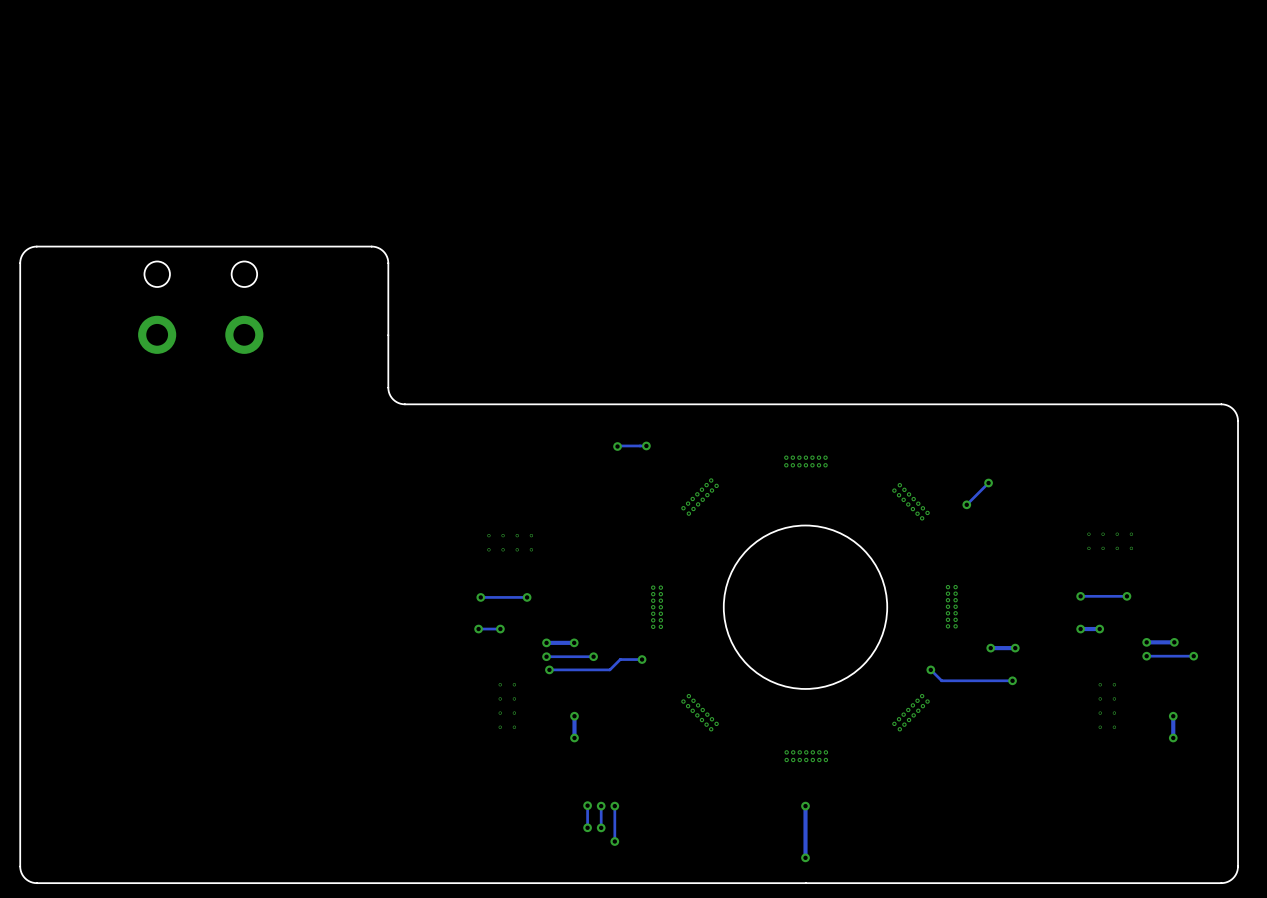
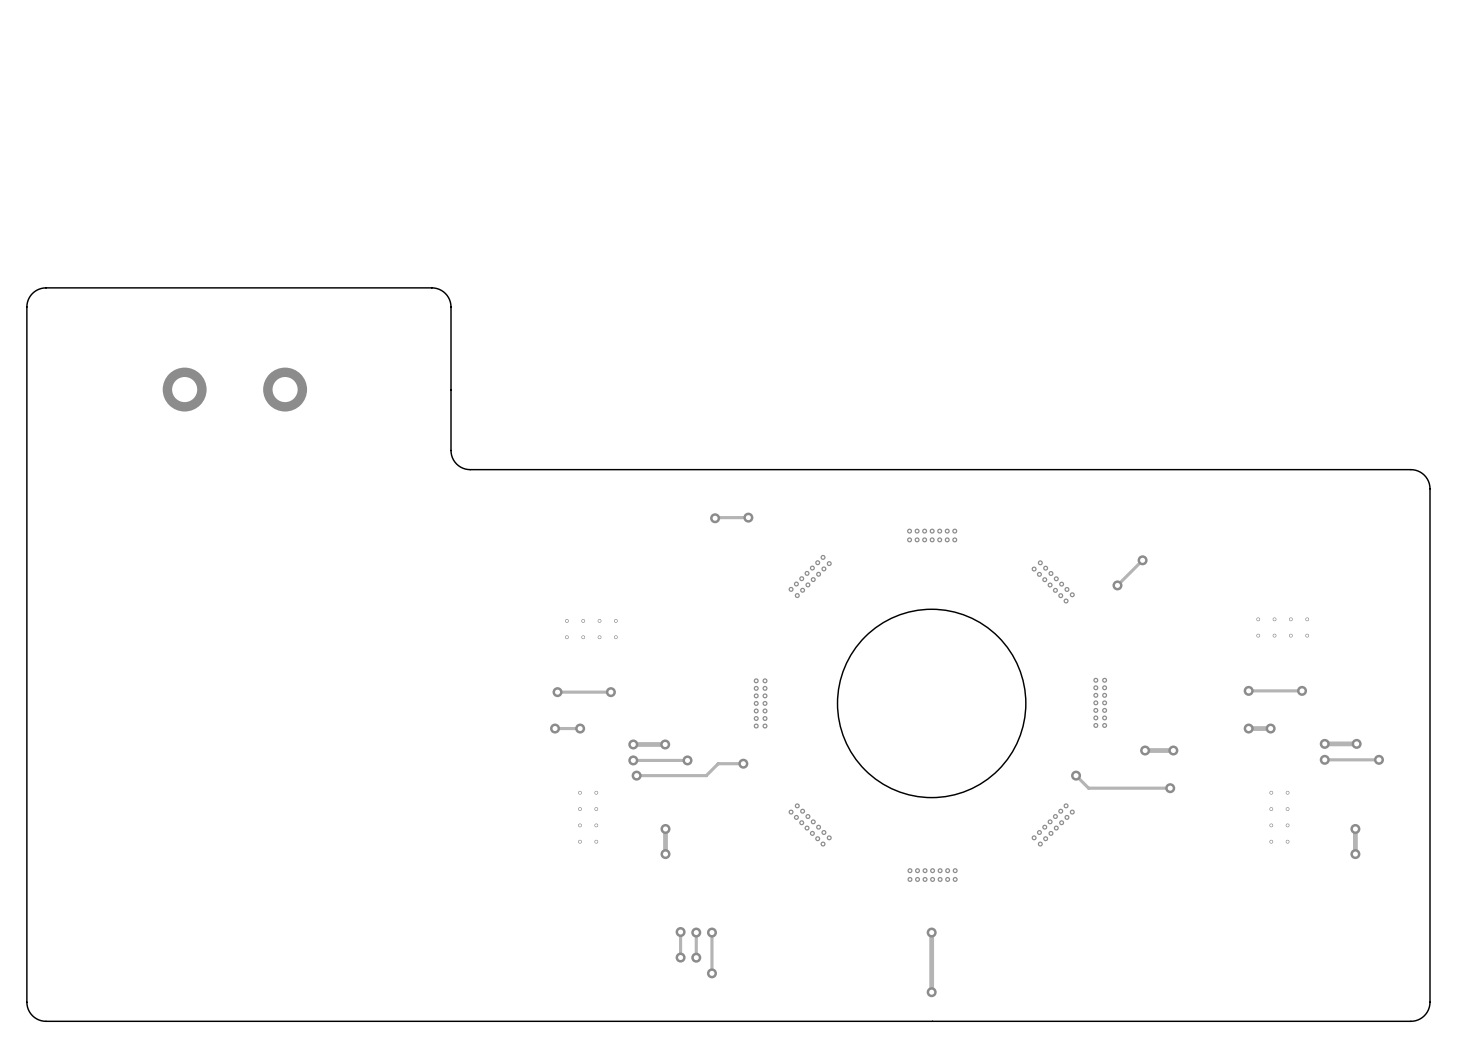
round board edge: [143, 260, 171, 288] -> none
round board edge: [231, 260, 258, 288] -> none

